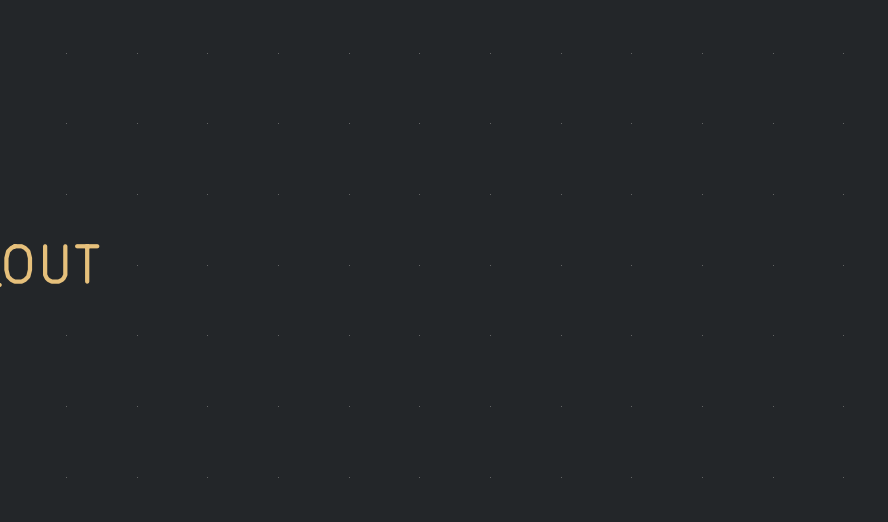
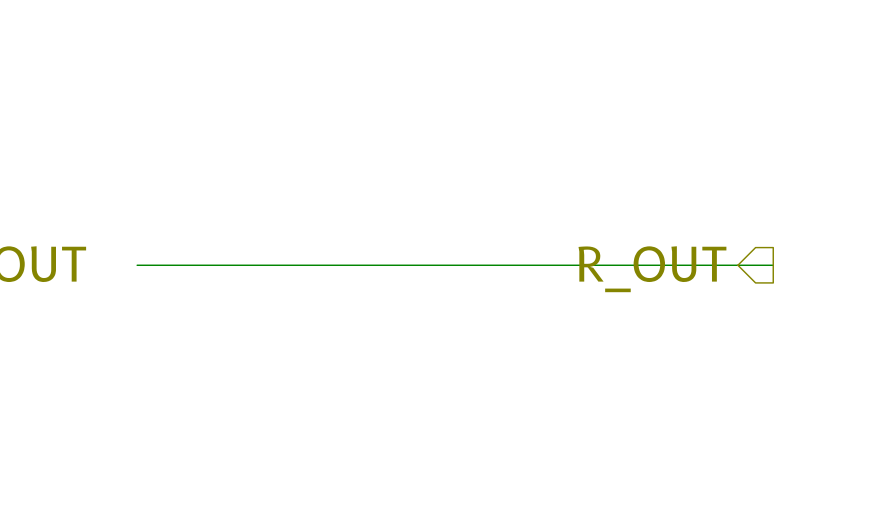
wire: none -> (137, 265) (773, 265)
hierarchical label: none -> R_OUT (652, 269)

